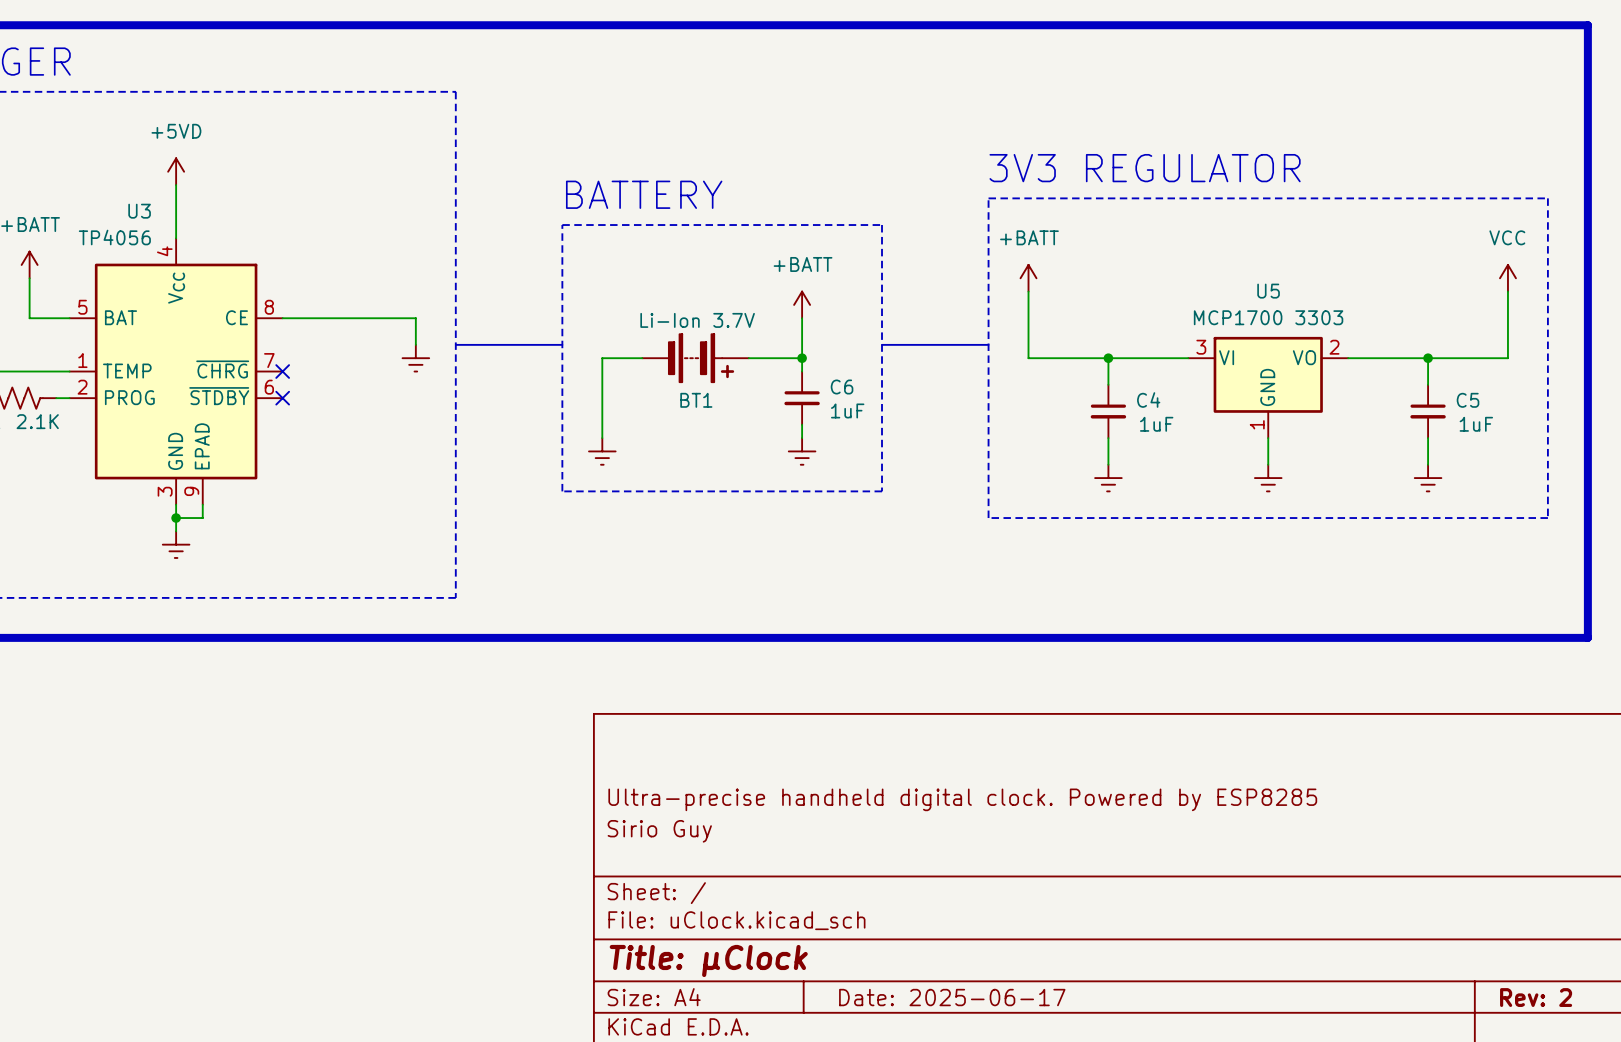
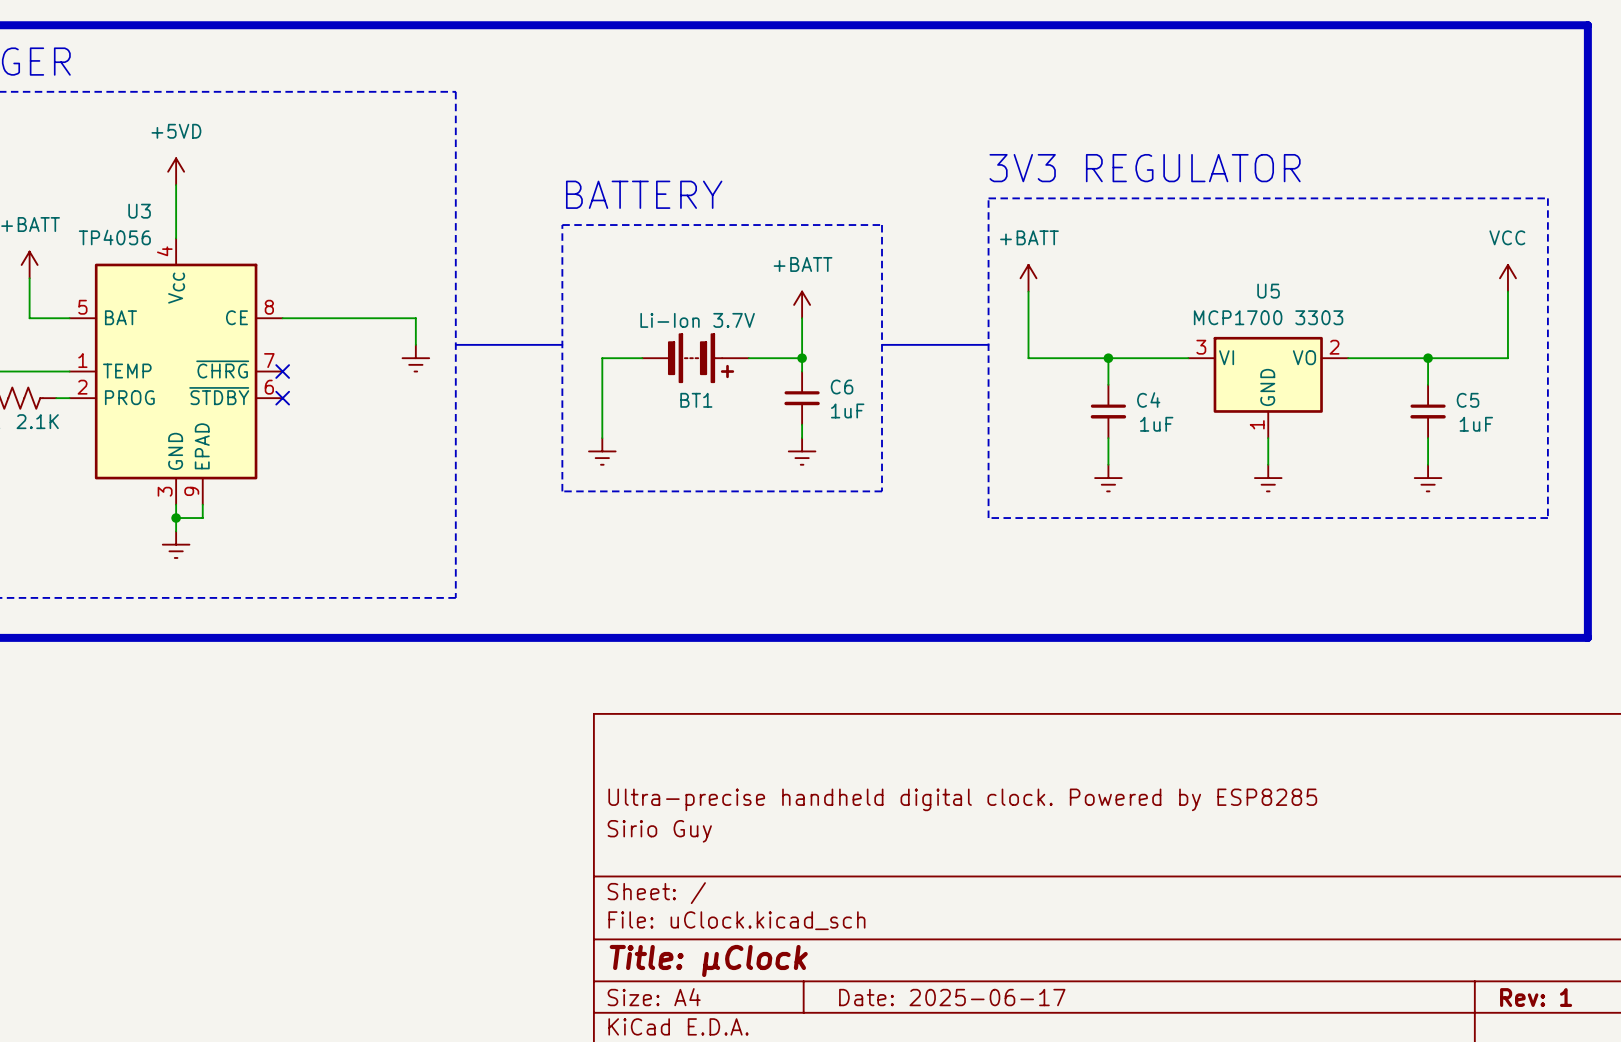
title block: Rev: 2 (1536, 997) -> Rev: 1 (1536, 997)

